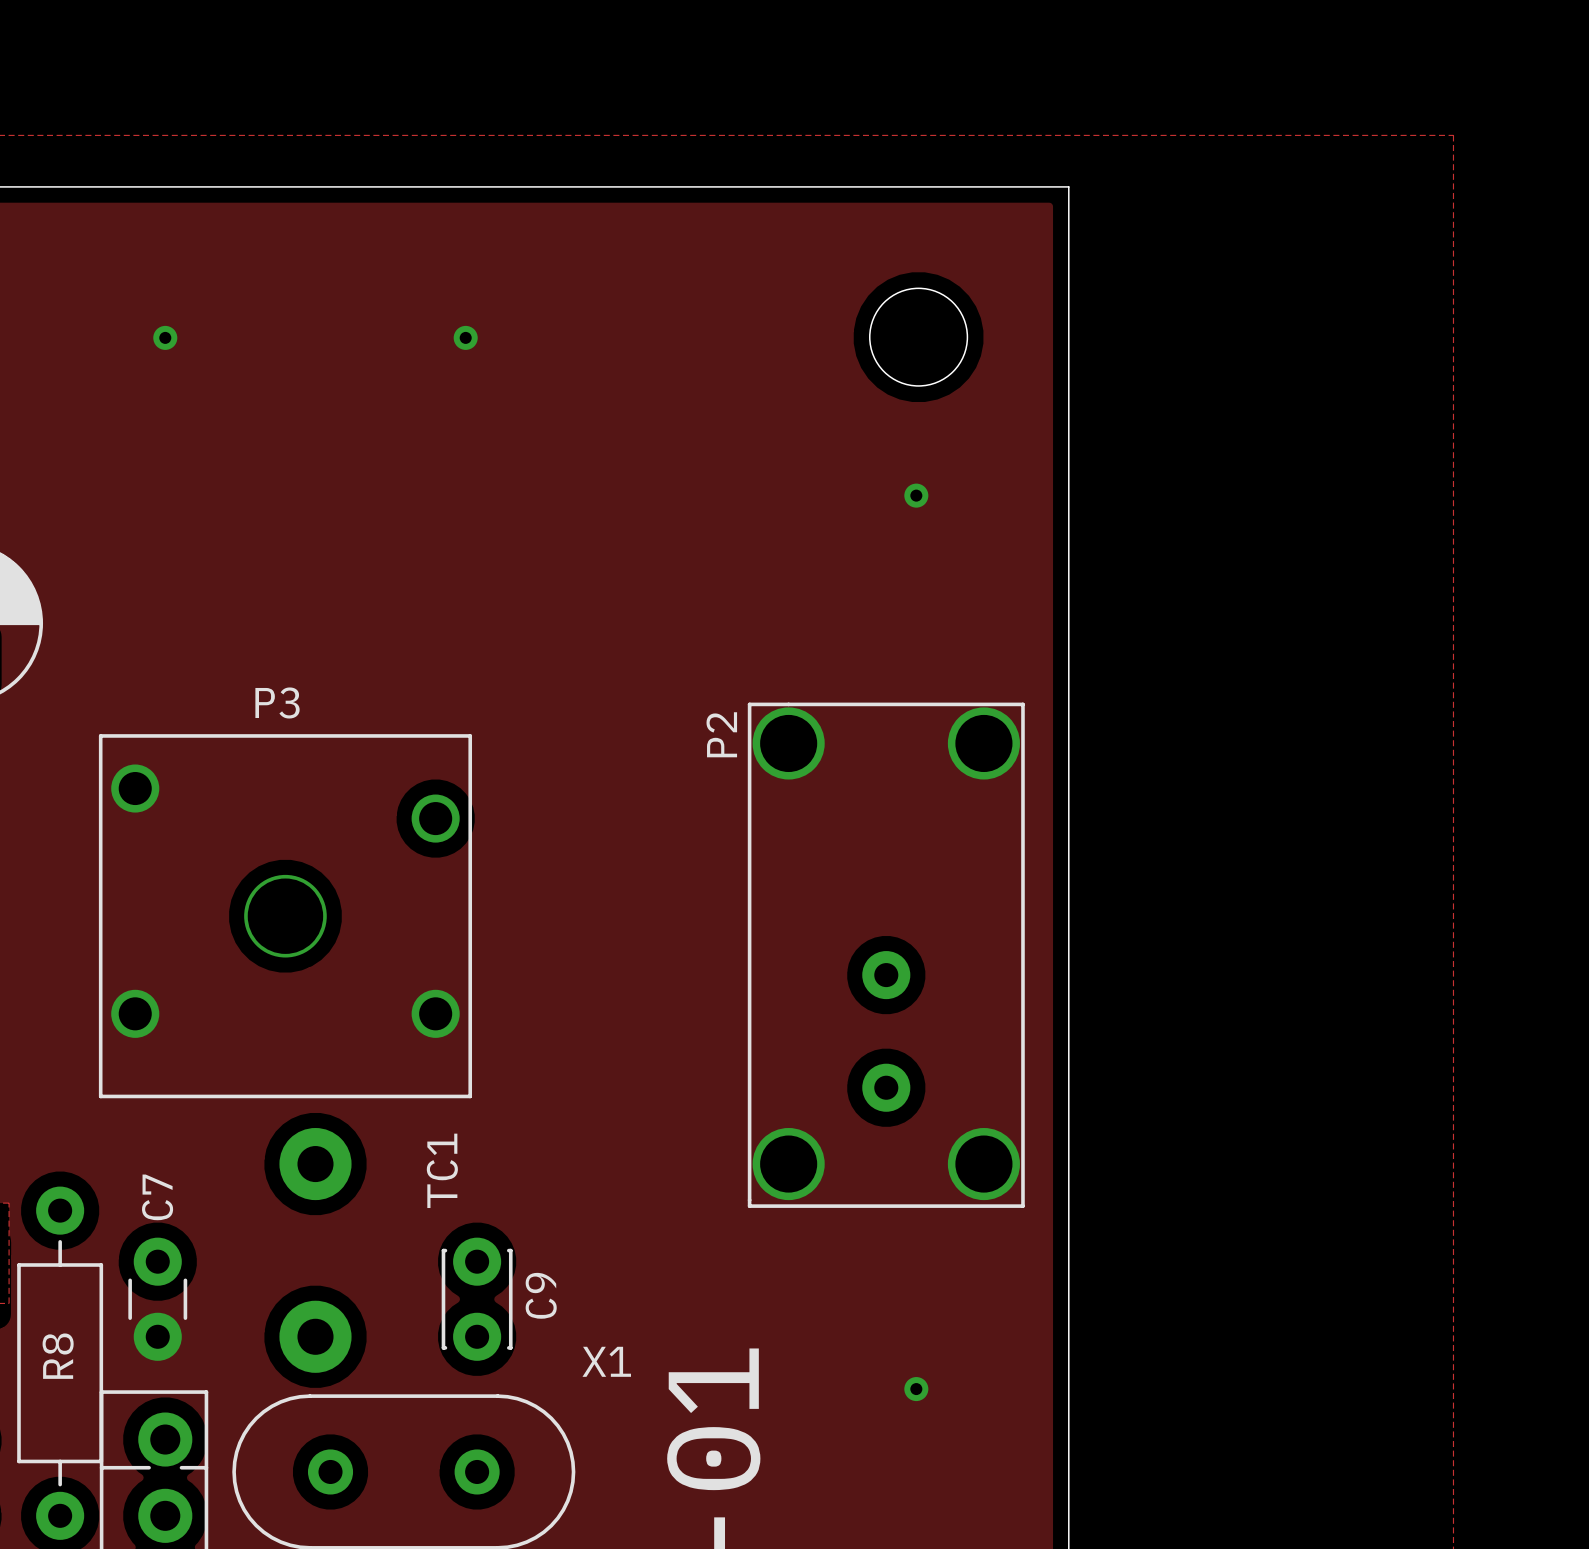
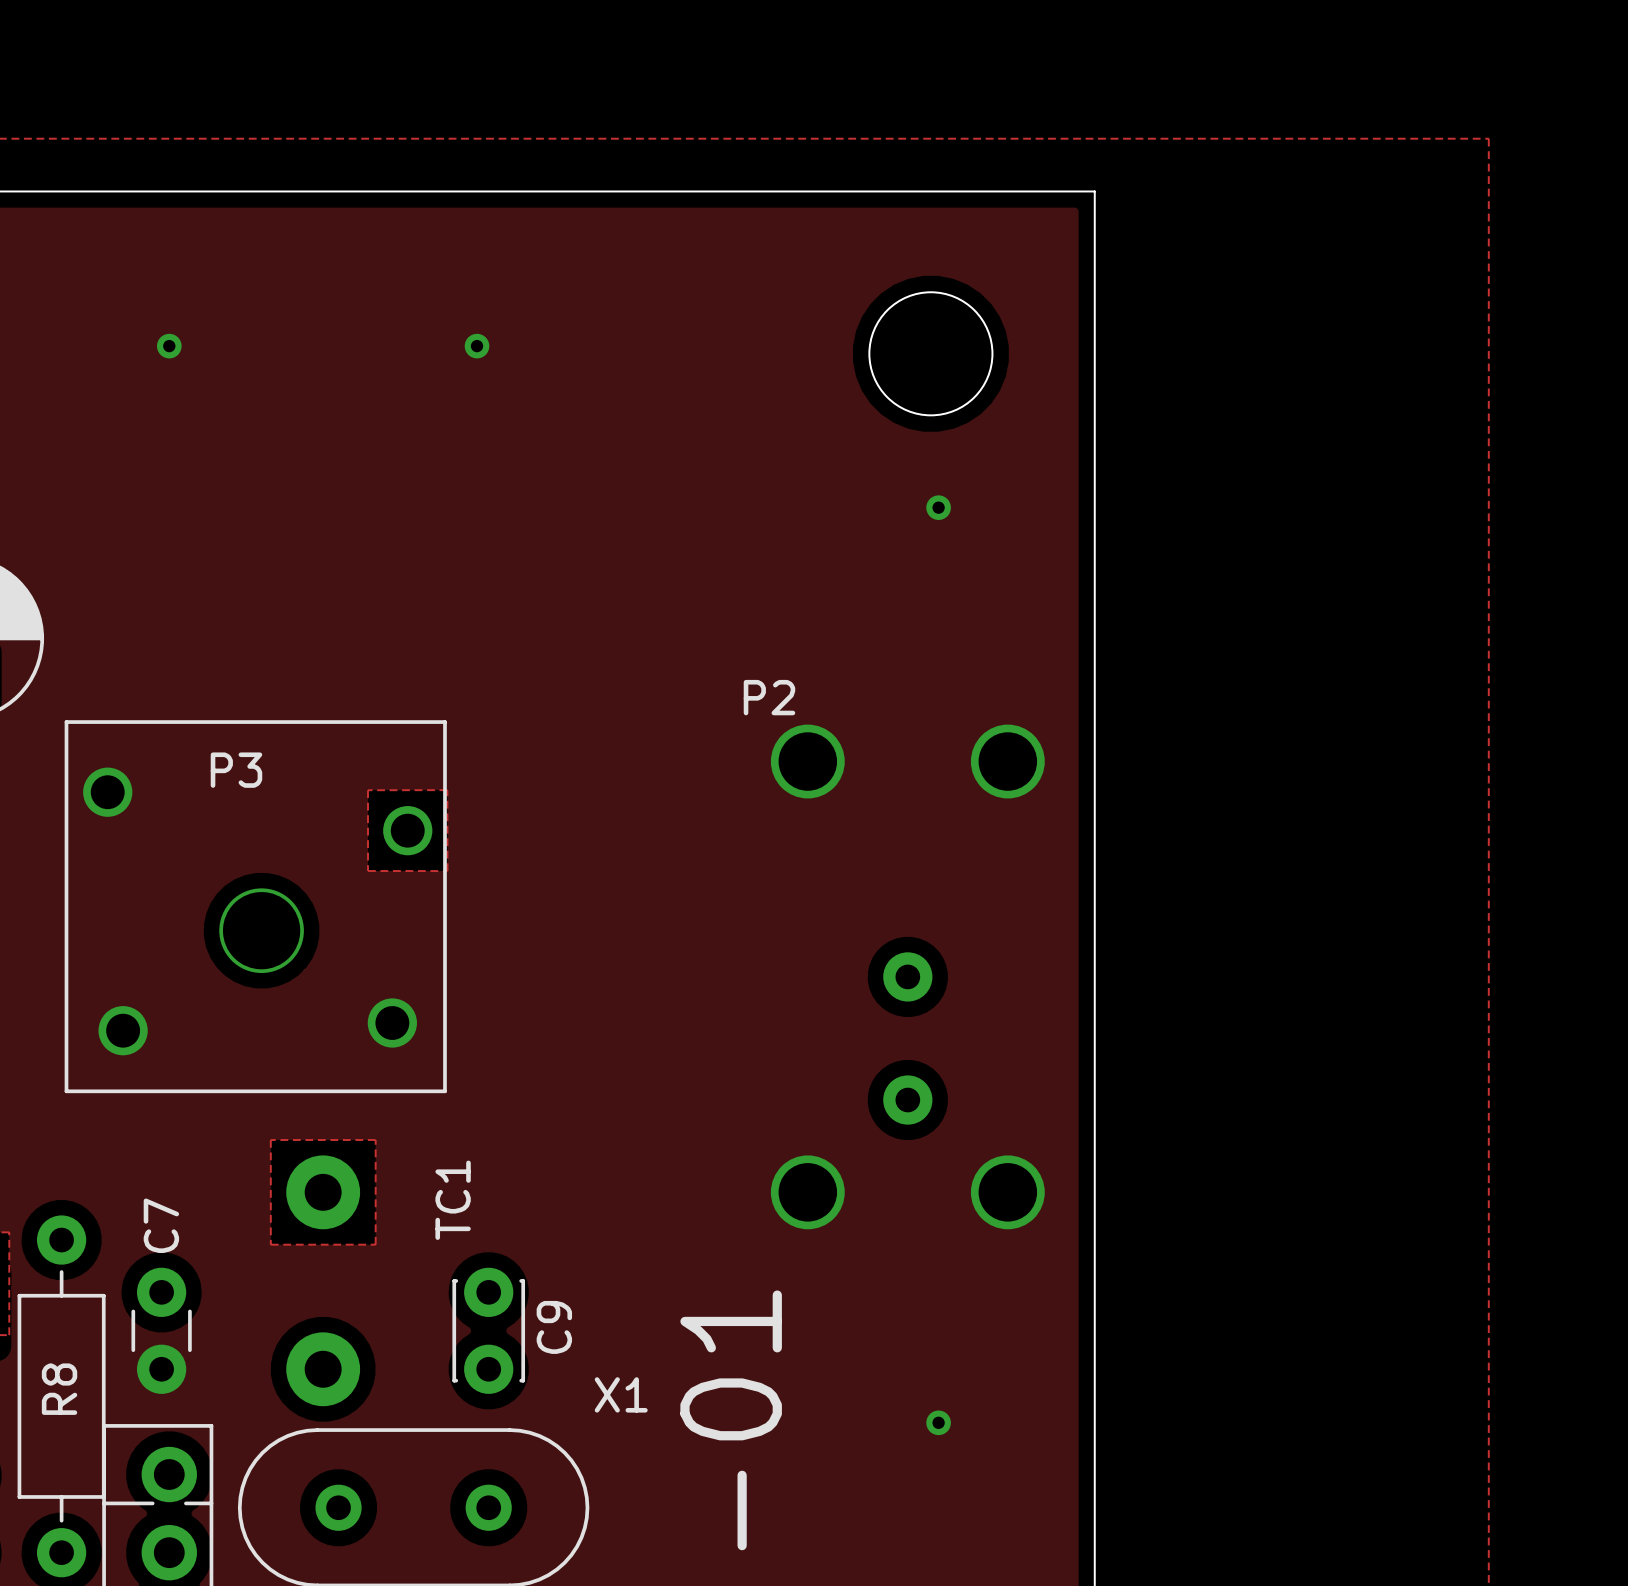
round board edge size: [869, 287, 969, 387] -> [868, 291, 994, 417]
P3 name position: P3 (277, 702) -> P3 (236, 770)
P2 footprint: [747, 702, 1025, 1208] -> [770, 724, 1045, 1230]
P3 footprint: [98, 734, 473, 1099] -> [64, 720, 447, 1094]
zone outline: none -> (368, 790) (368, 870) (447, 871) (447, 790) (368, 790)
zone outline: none -> (270, 1139) (270, 1244) (375, 1244) (375, 1139) (270, 1139)

